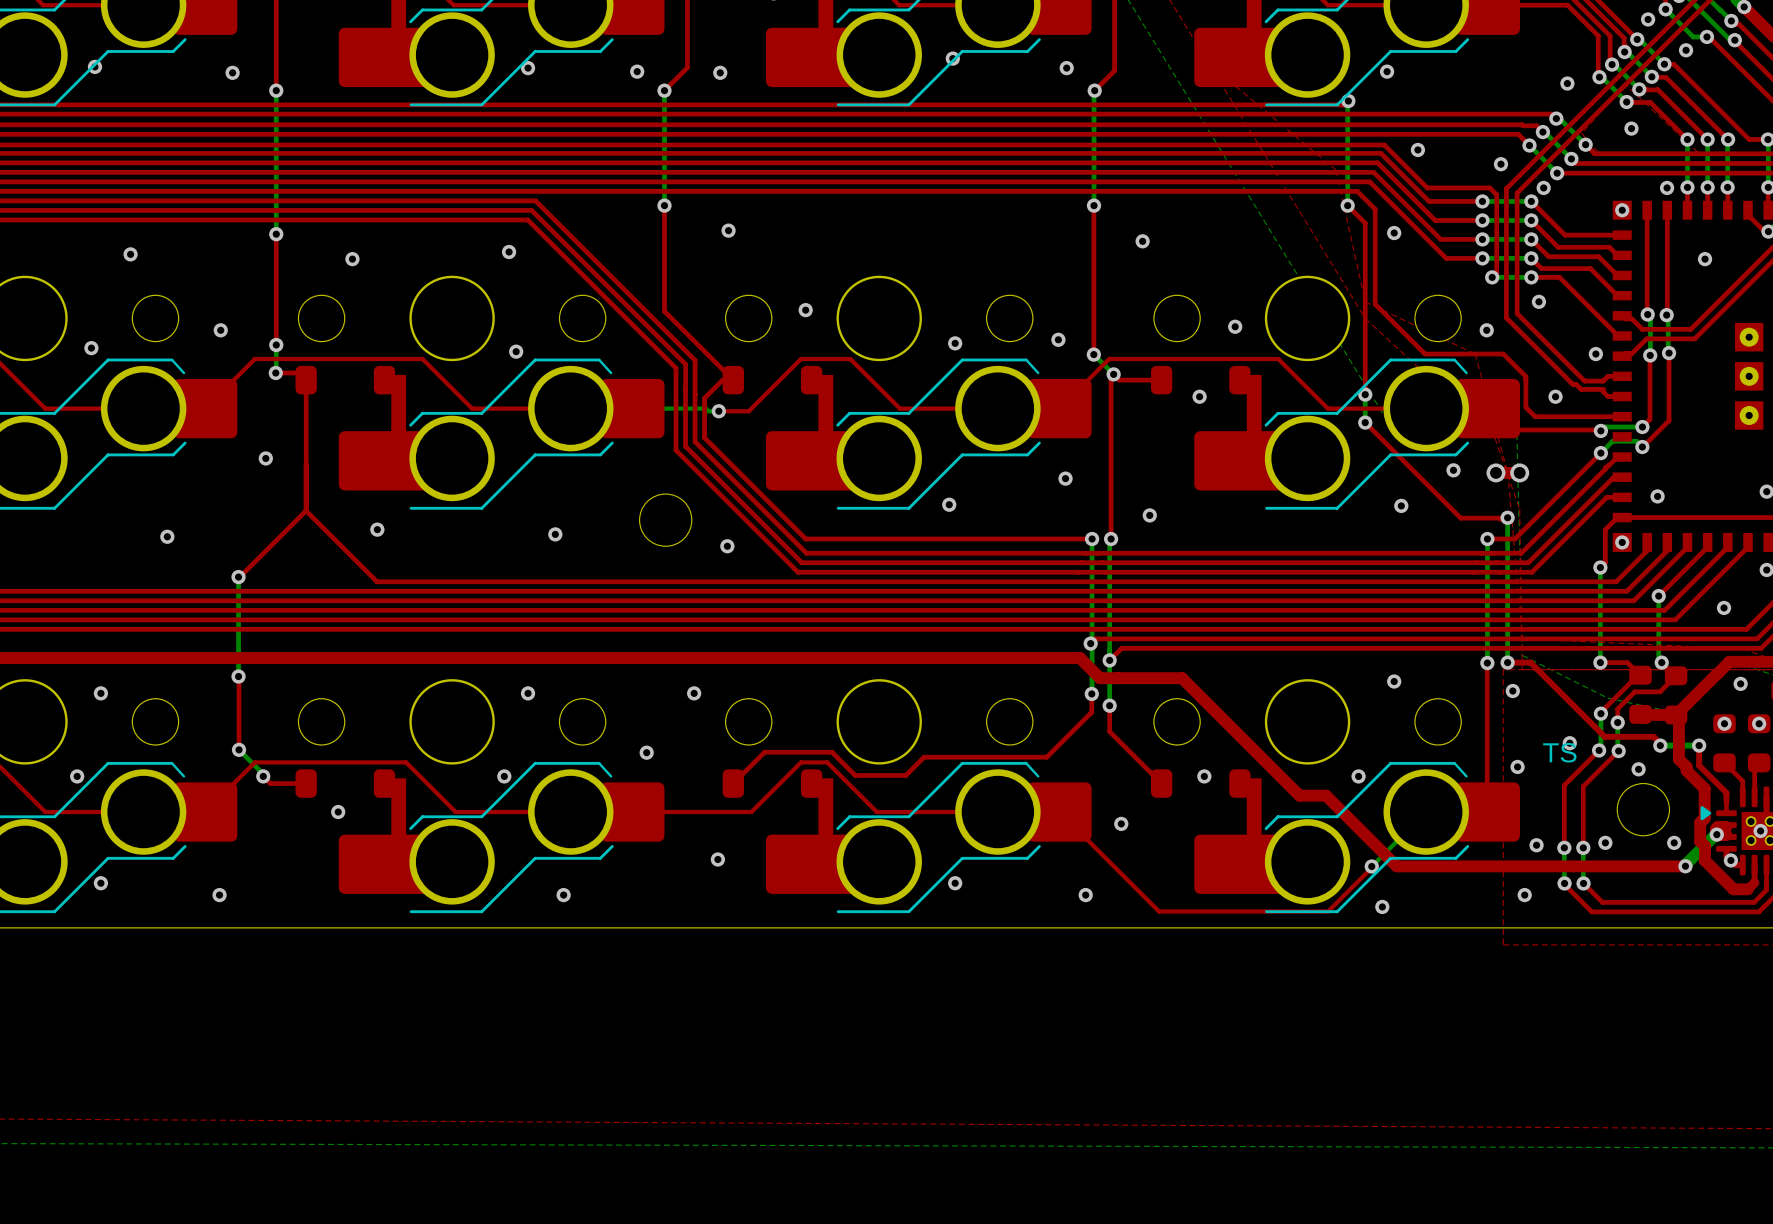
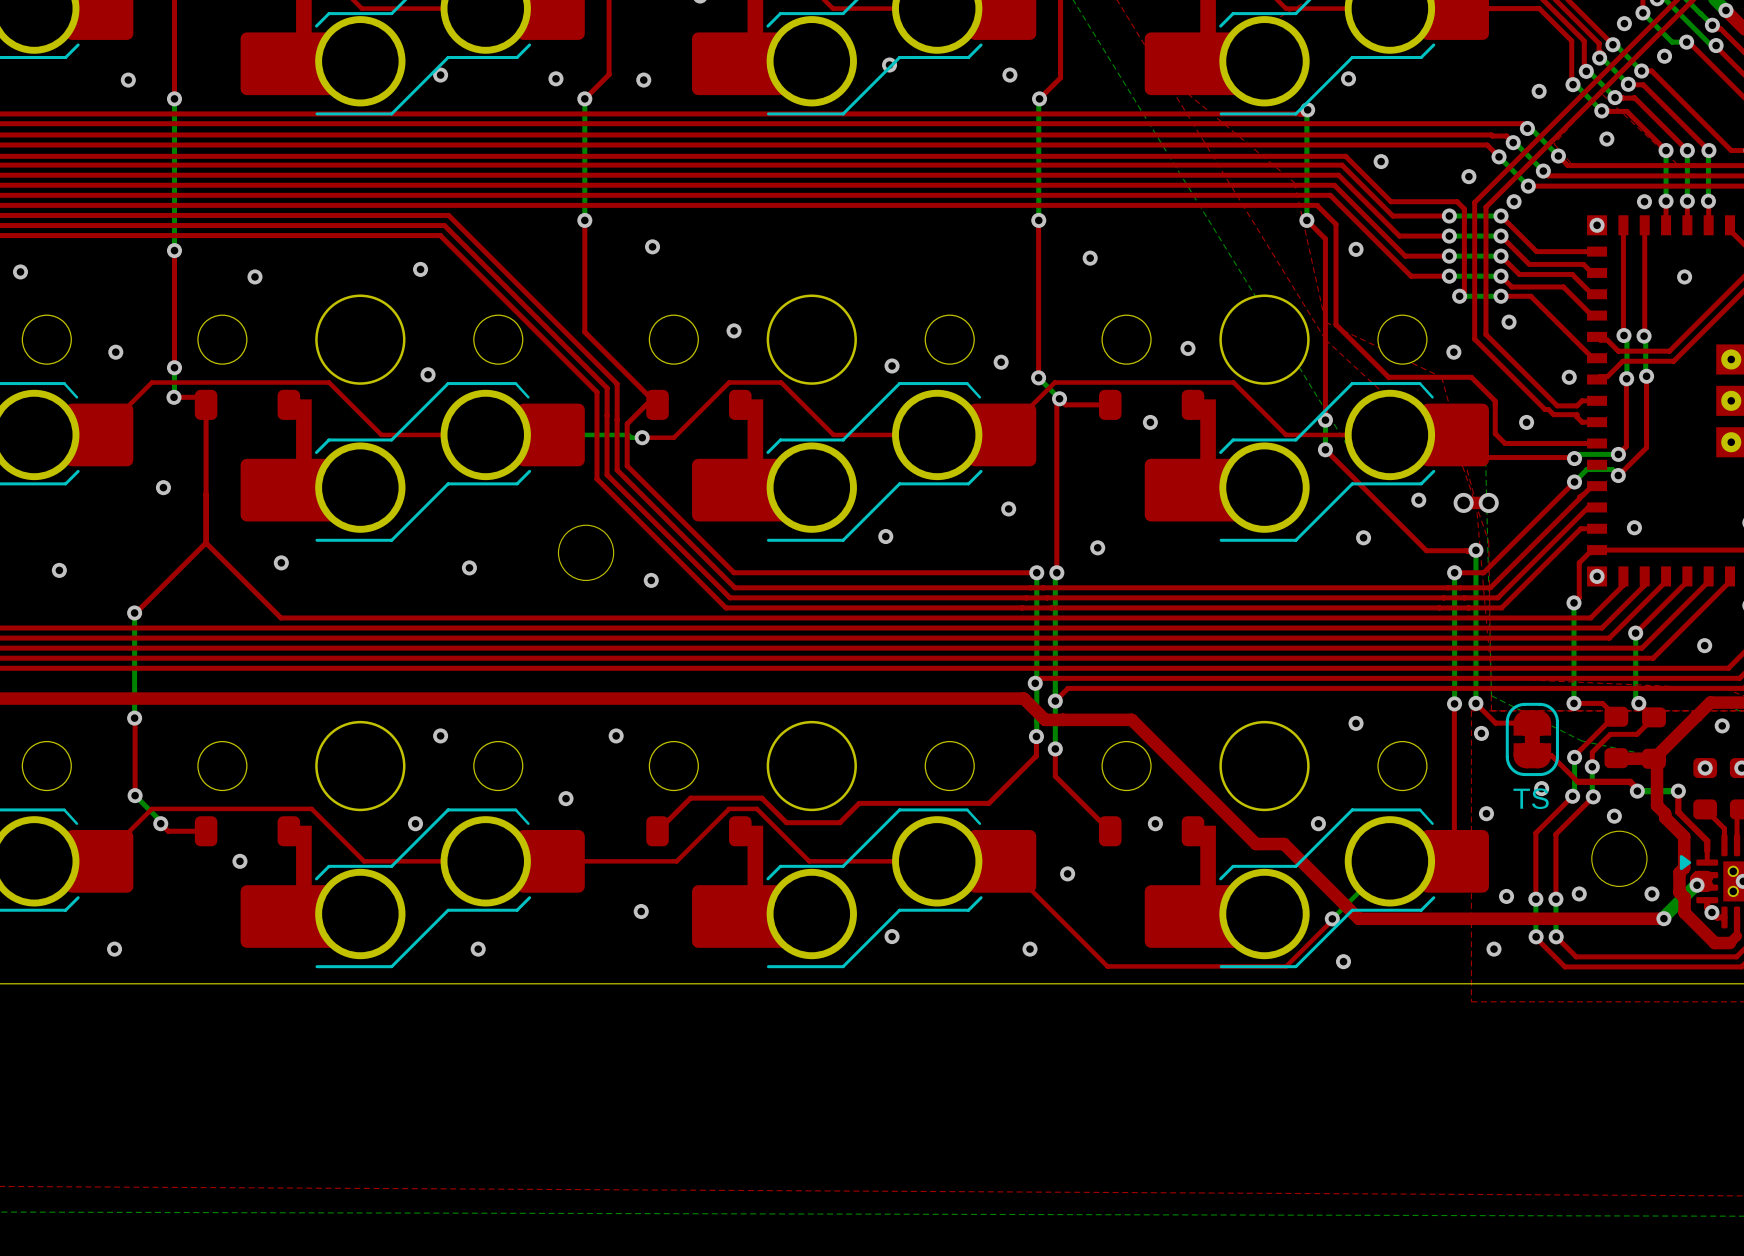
top track: (1507, 662) (1530, 662) (1604, 736) -> (1475, 703) (1495, 723) (1532, 723)
part: none -> (1532, 739)
top track: none -> (1532, 755) (1551, 755) (1578, 781)

